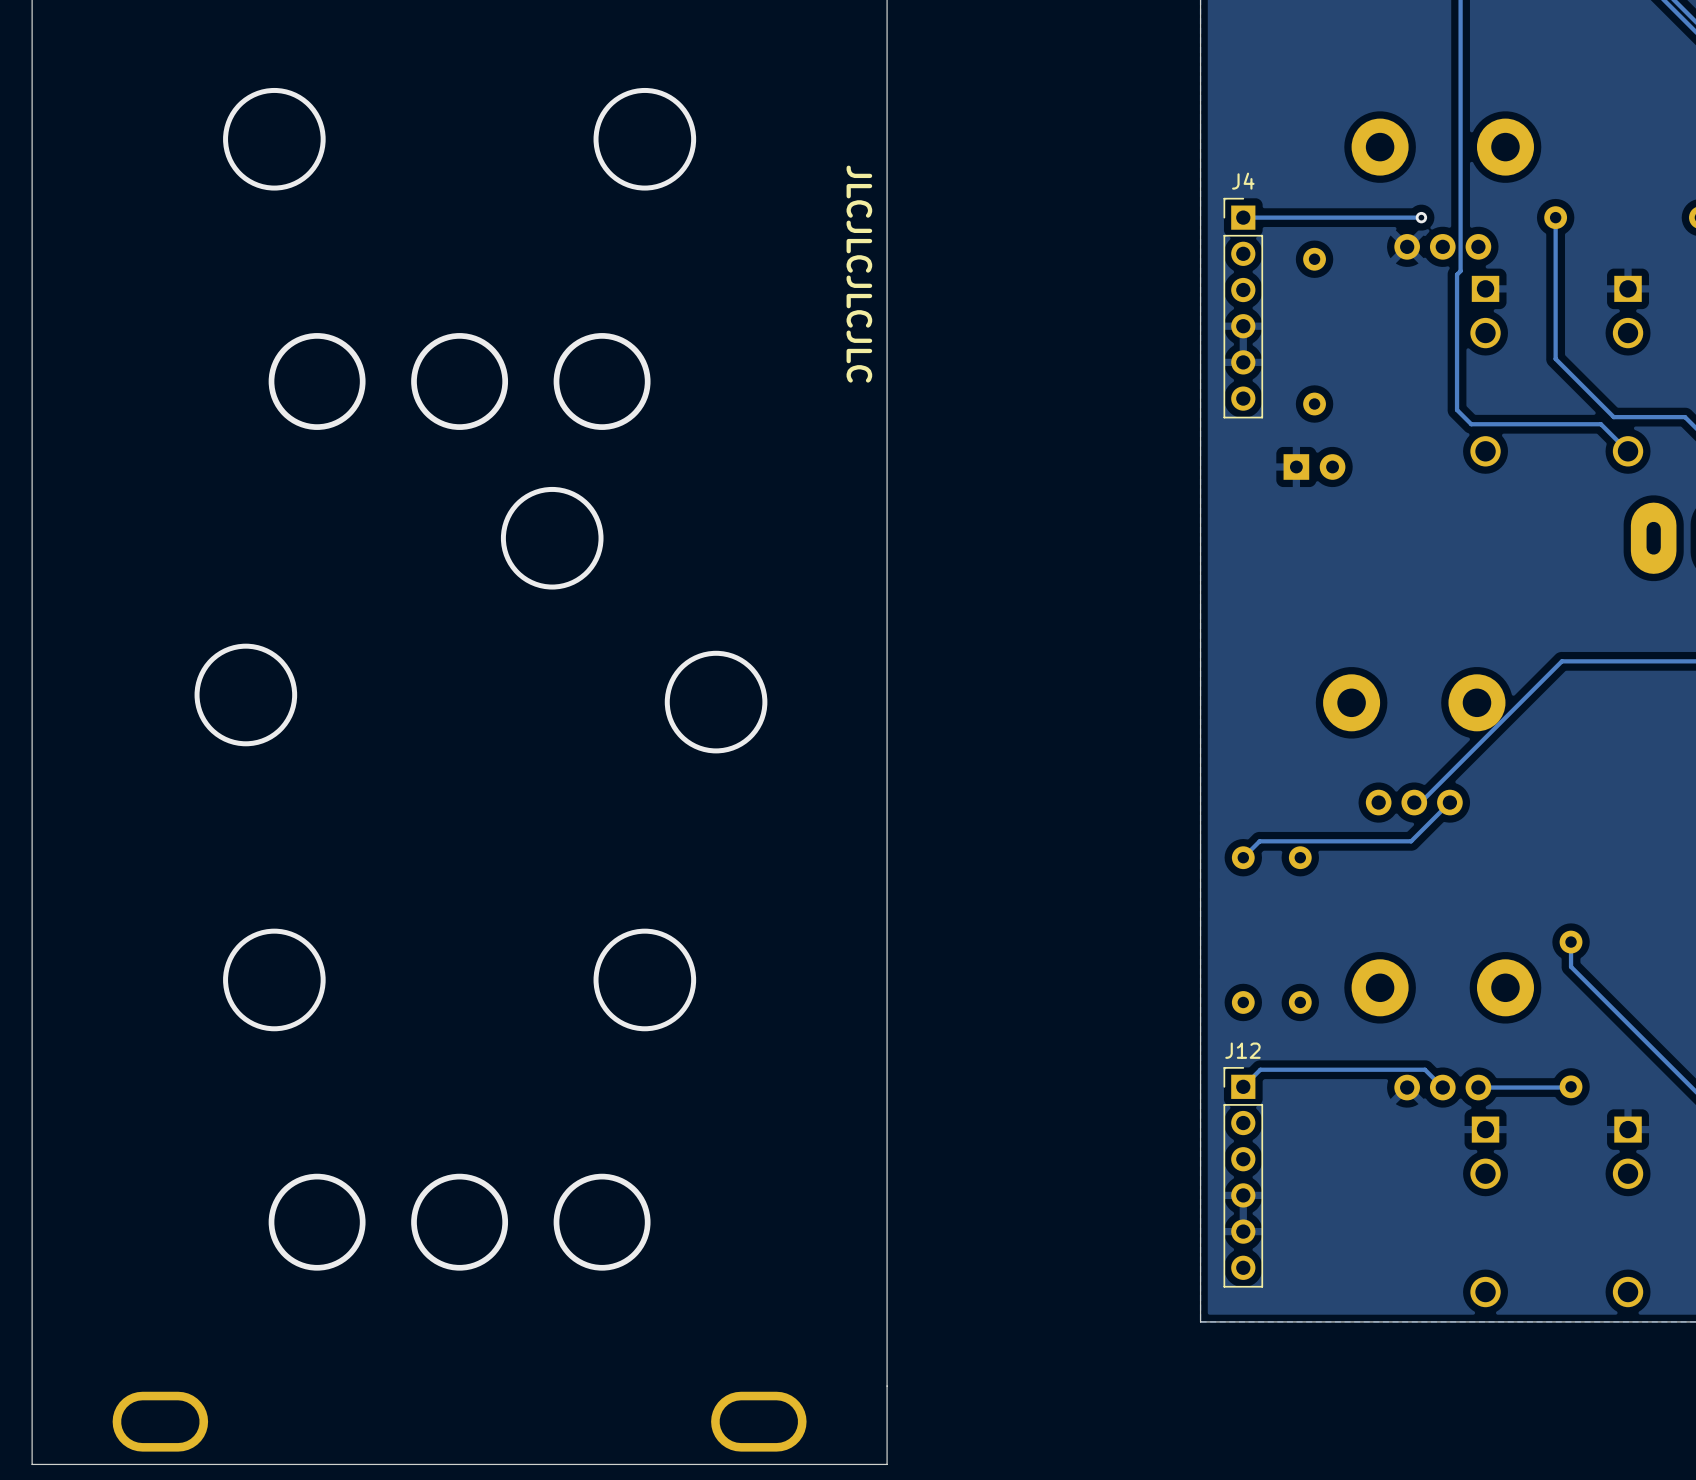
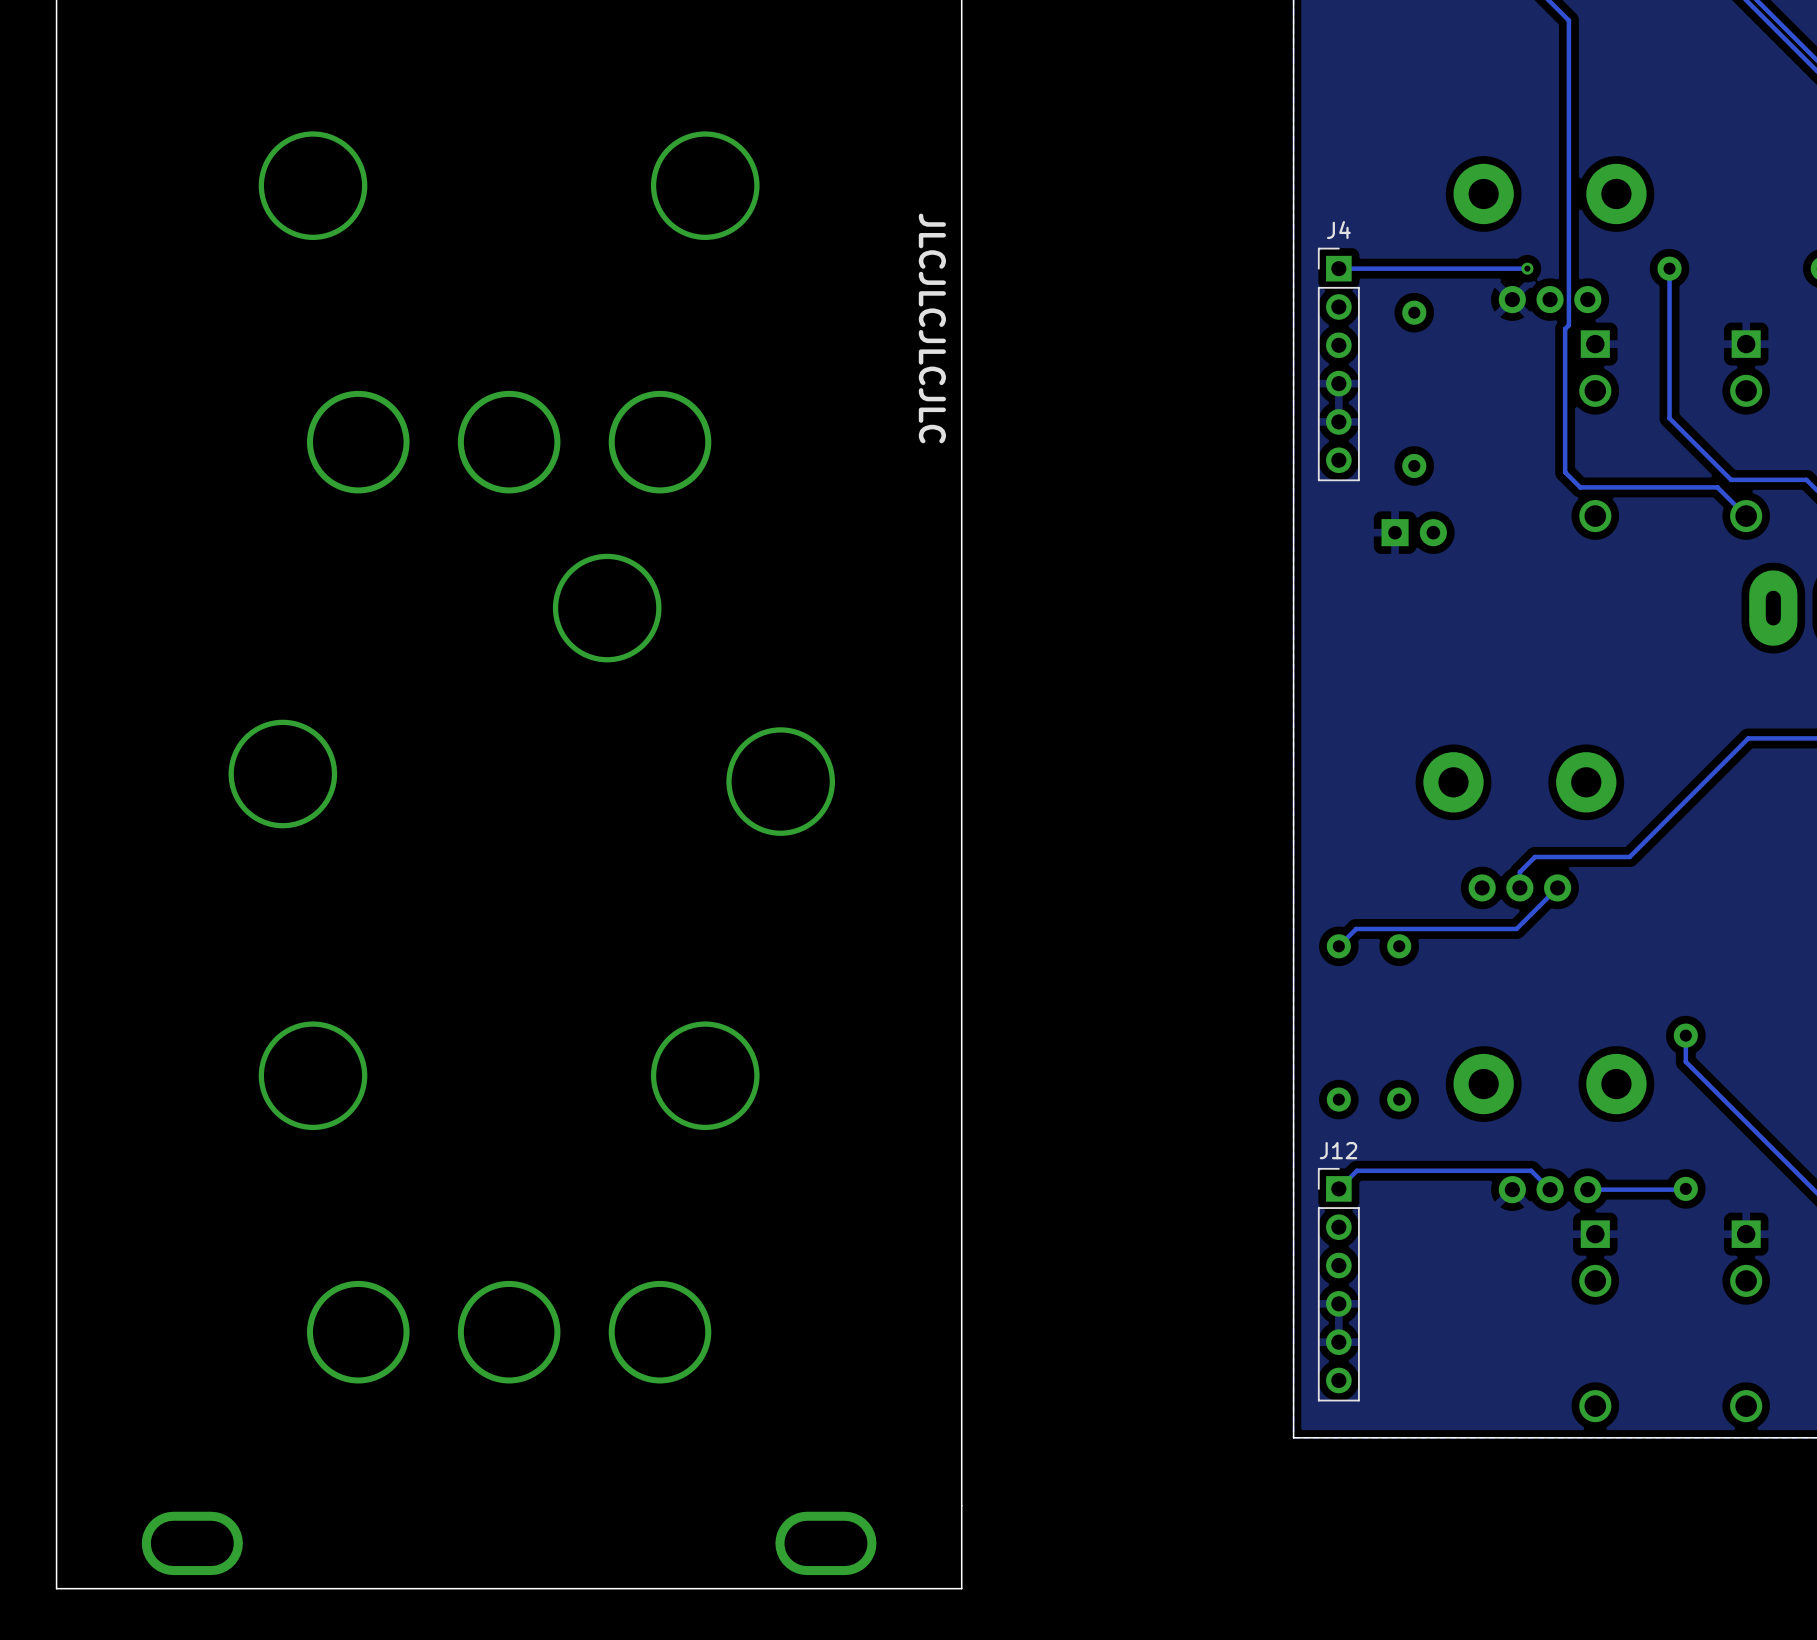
track: (1630, 661) (1561, 661) (1420, 802) (1414, 802) -> (1748, 738) (1629, 857) (1534, 857) (1519, 872) (1519, 887)

